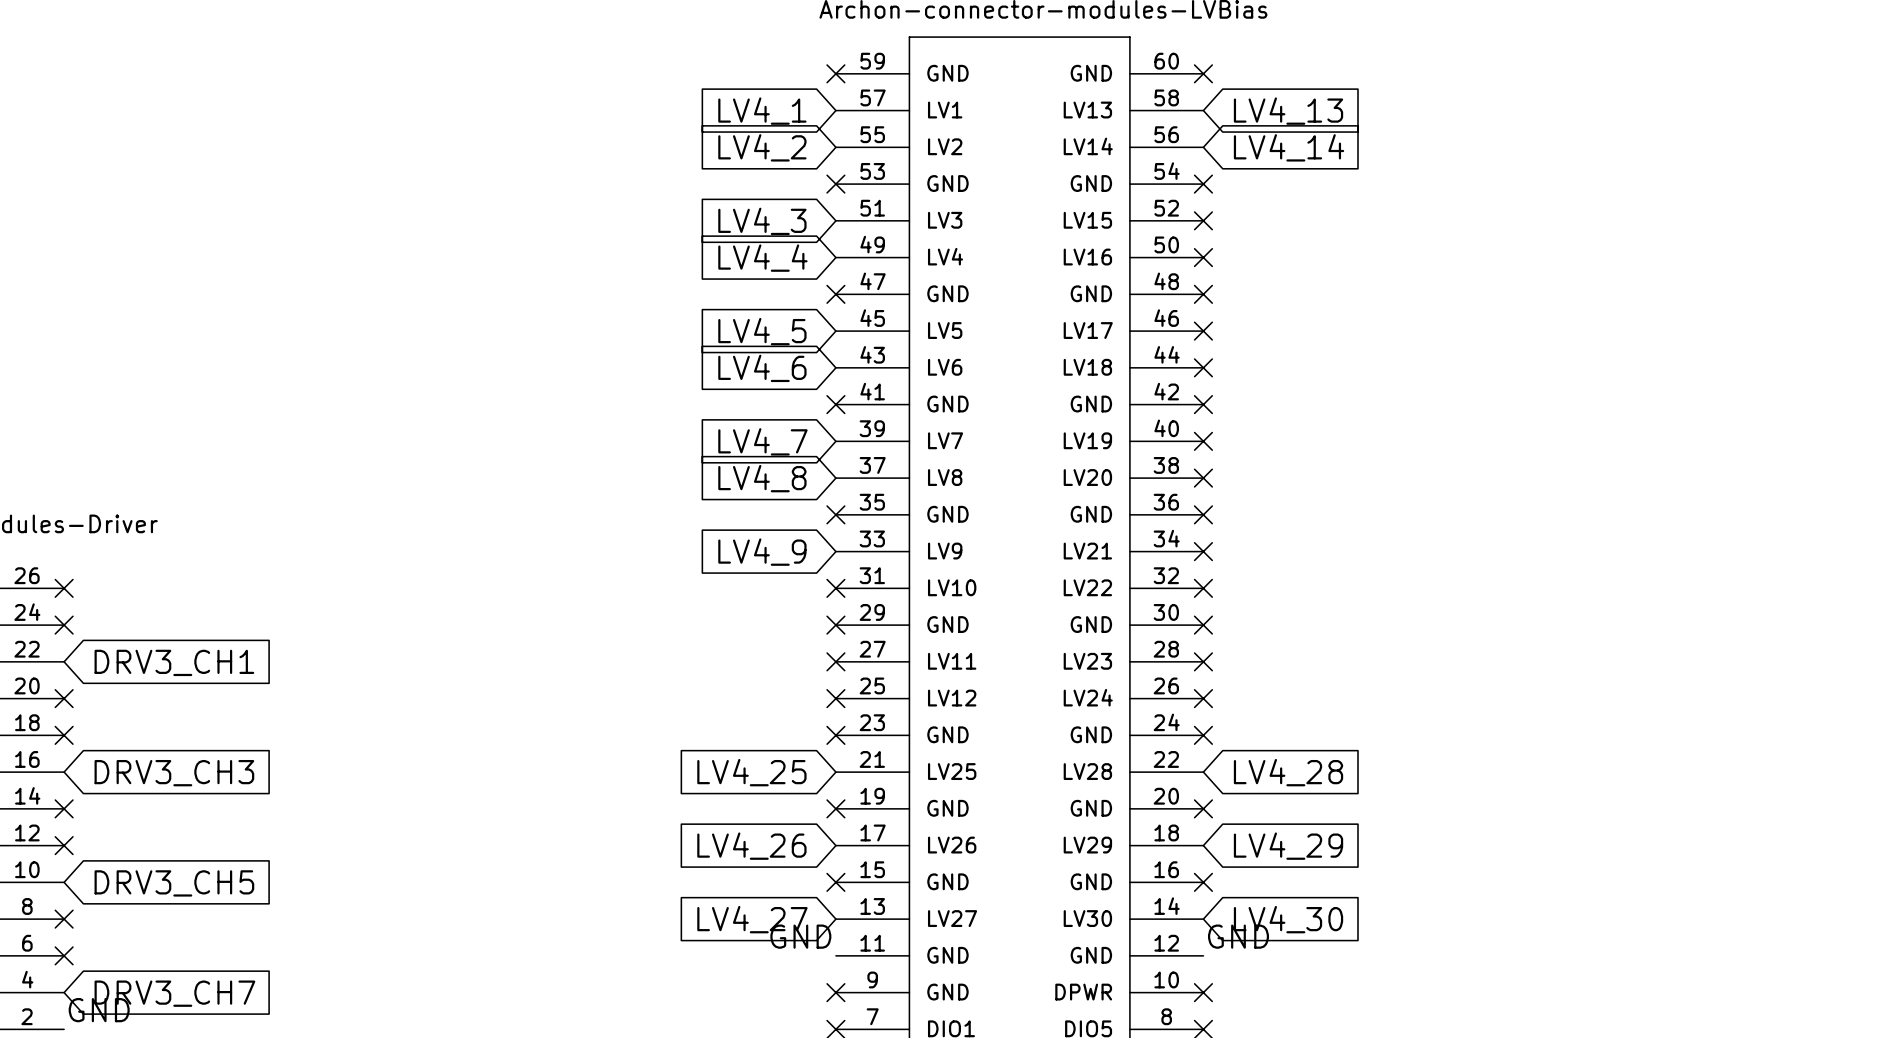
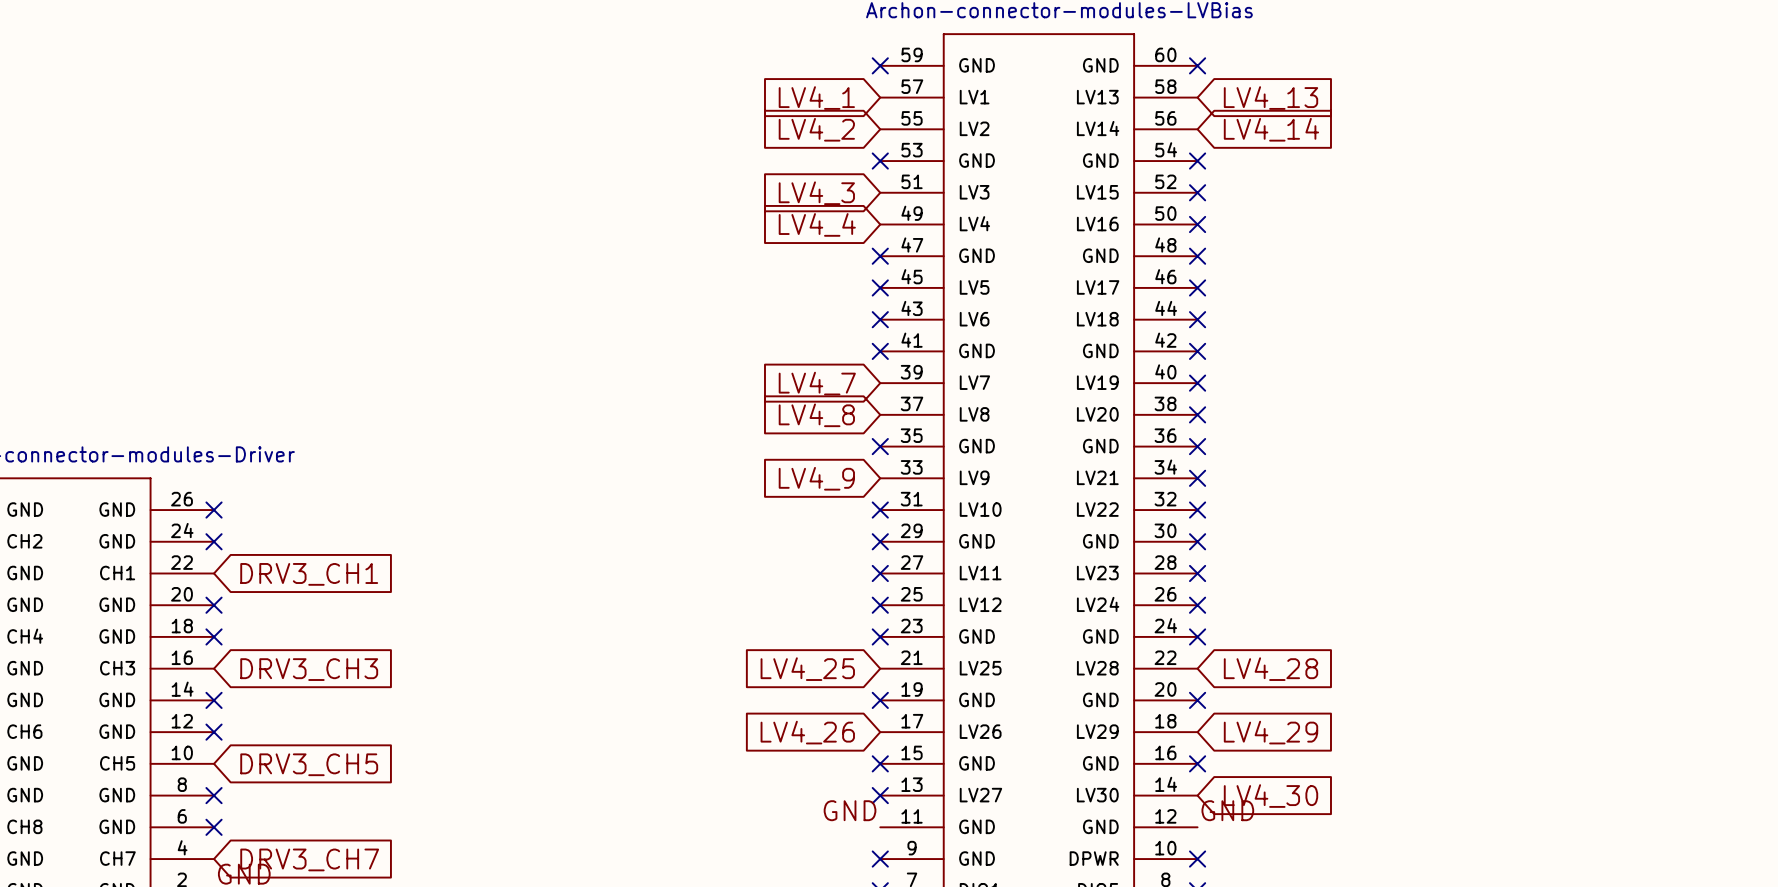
global label: LV4_5 (762, 331) -> none
no-connect mark: none -> (880, 287)
no-connect mark: none -> (880, 319)
global label: LV4_6 (762, 368) -> none
global label: LV4_27 (752, 919) -> none
no-connect mark: none -> (880, 795)

